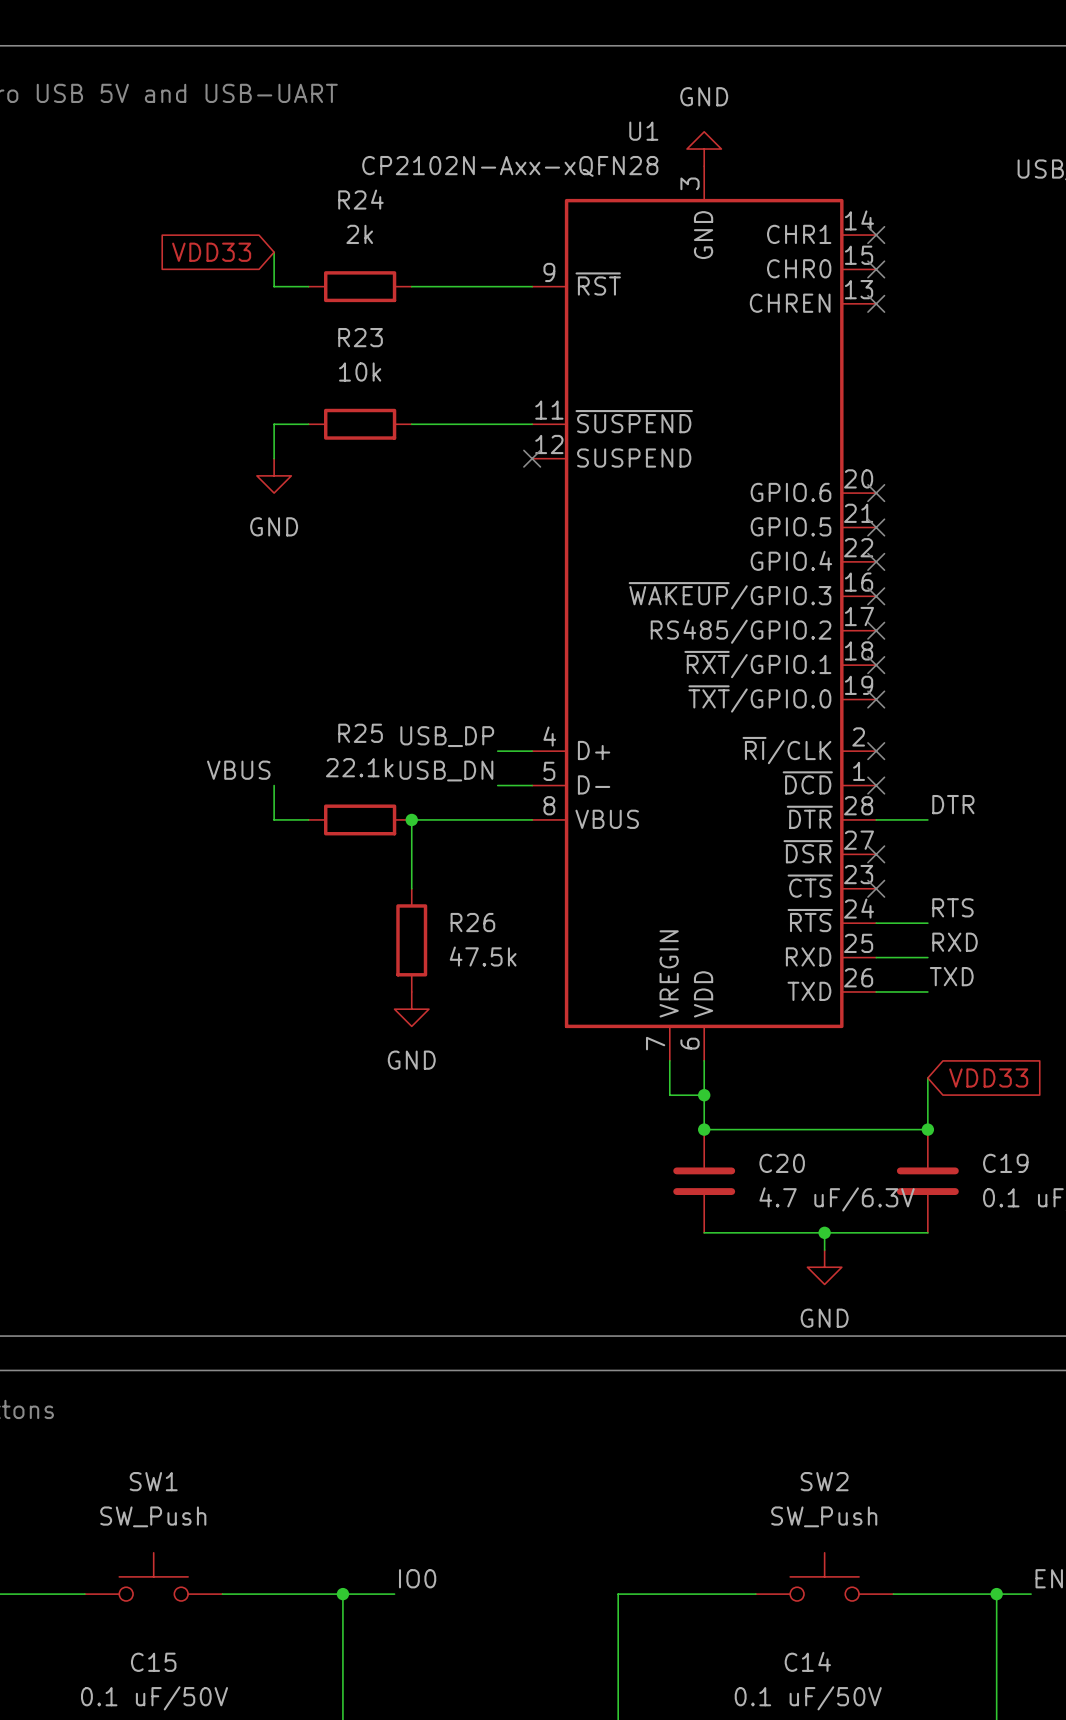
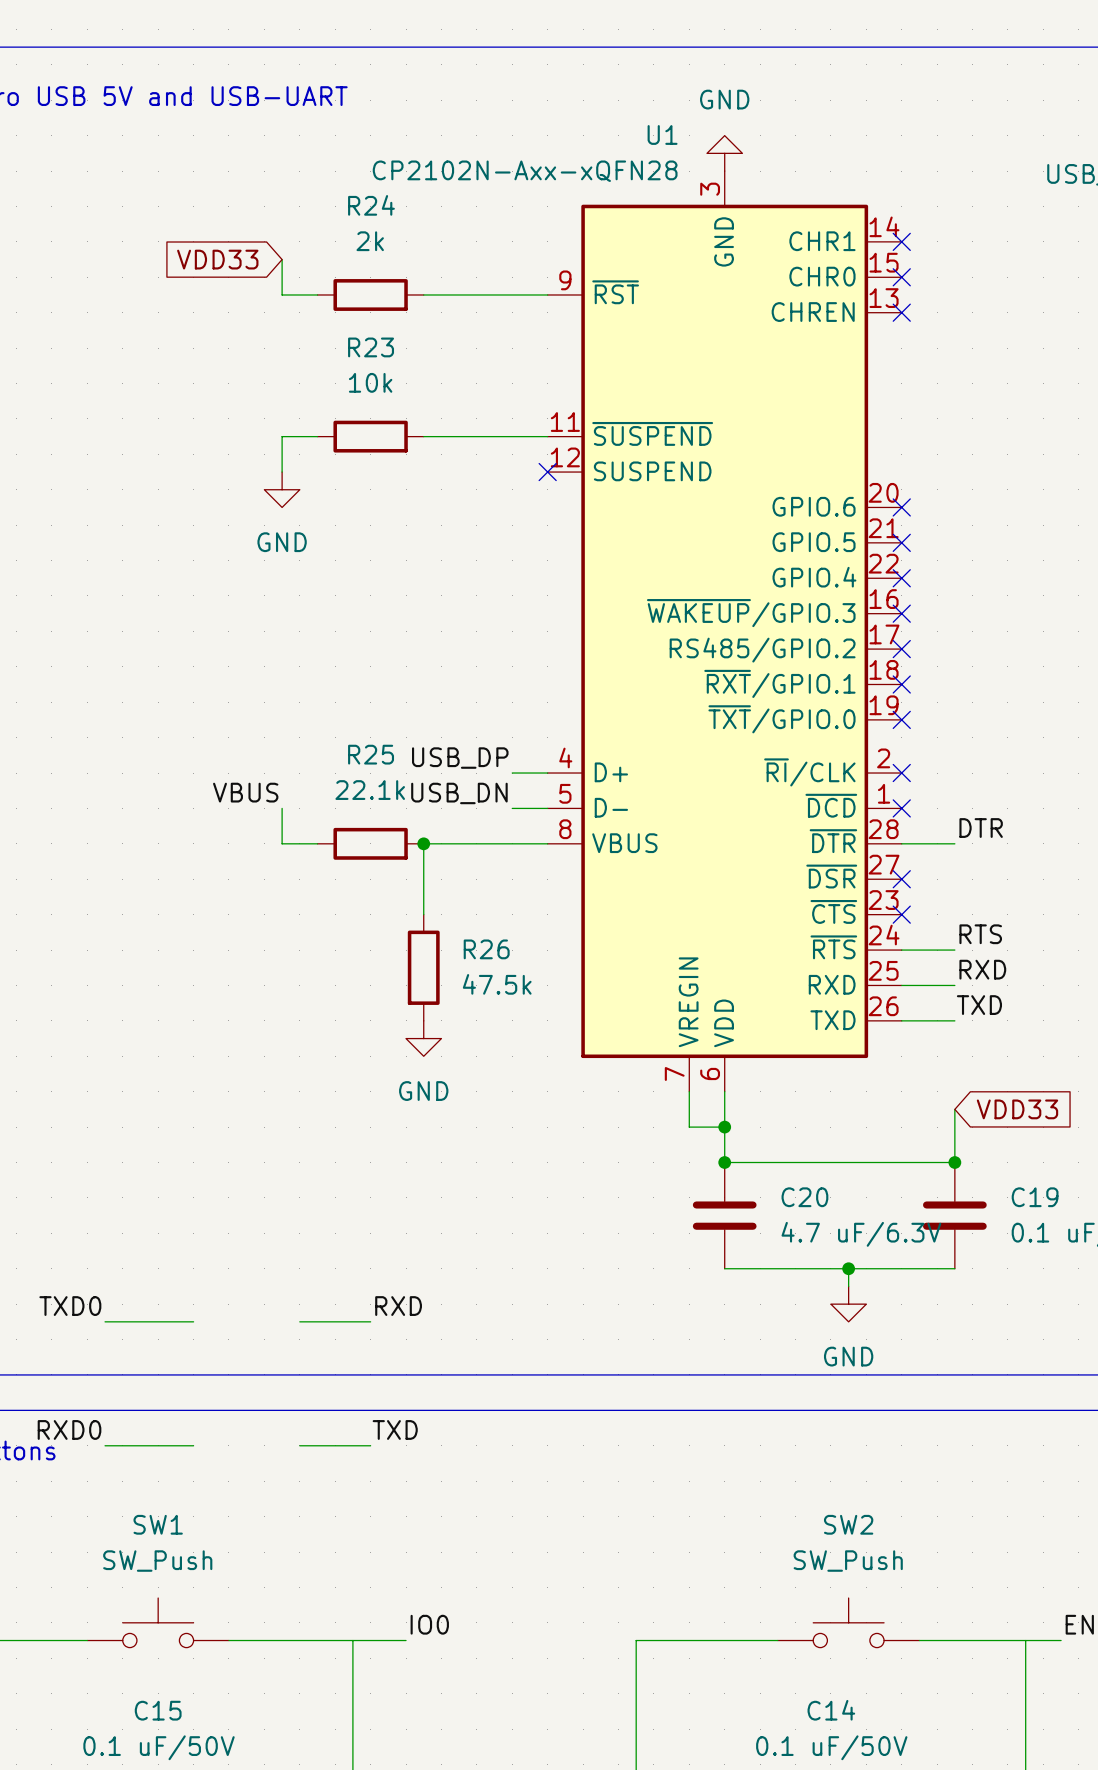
label: none -> TXD0 (70, 1306)
label: none -> RXD (398, 1306)
wire: none -> (105, 1321) (193, 1321)
wire: none -> (299, 1321) (370, 1321)
label: none -> RXD0 (69, 1429)
label: none -> TXD (395, 1429)
wire: none -> (105, 1445) (193, 1445)
wire: none -> (299, 1445) (370, 1445)
junction: (342, 1594) -> none
junction: (996, 1594) -> none

